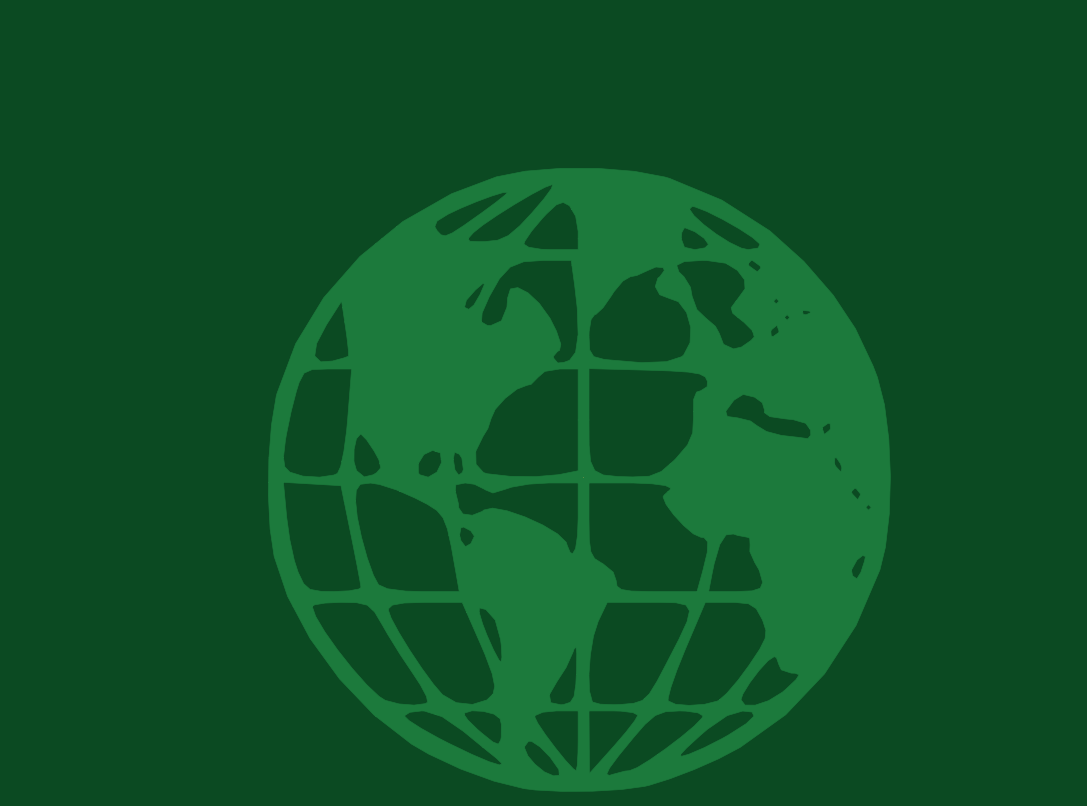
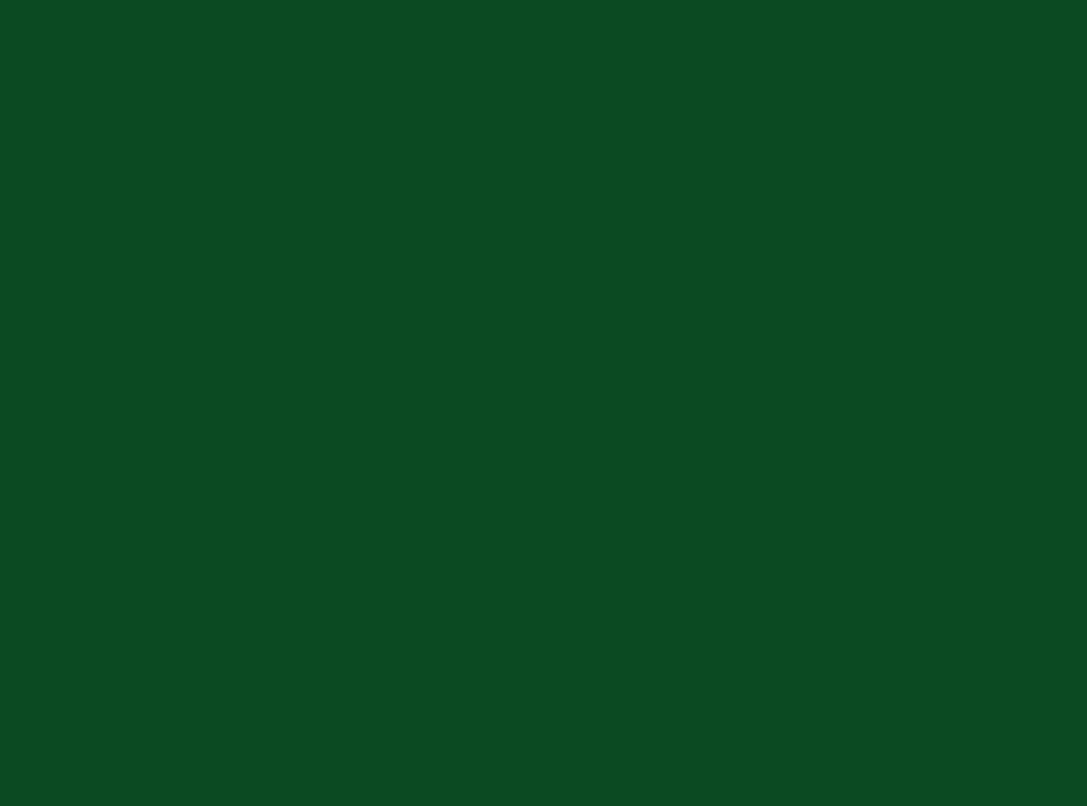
part: (579, 479) -> none

